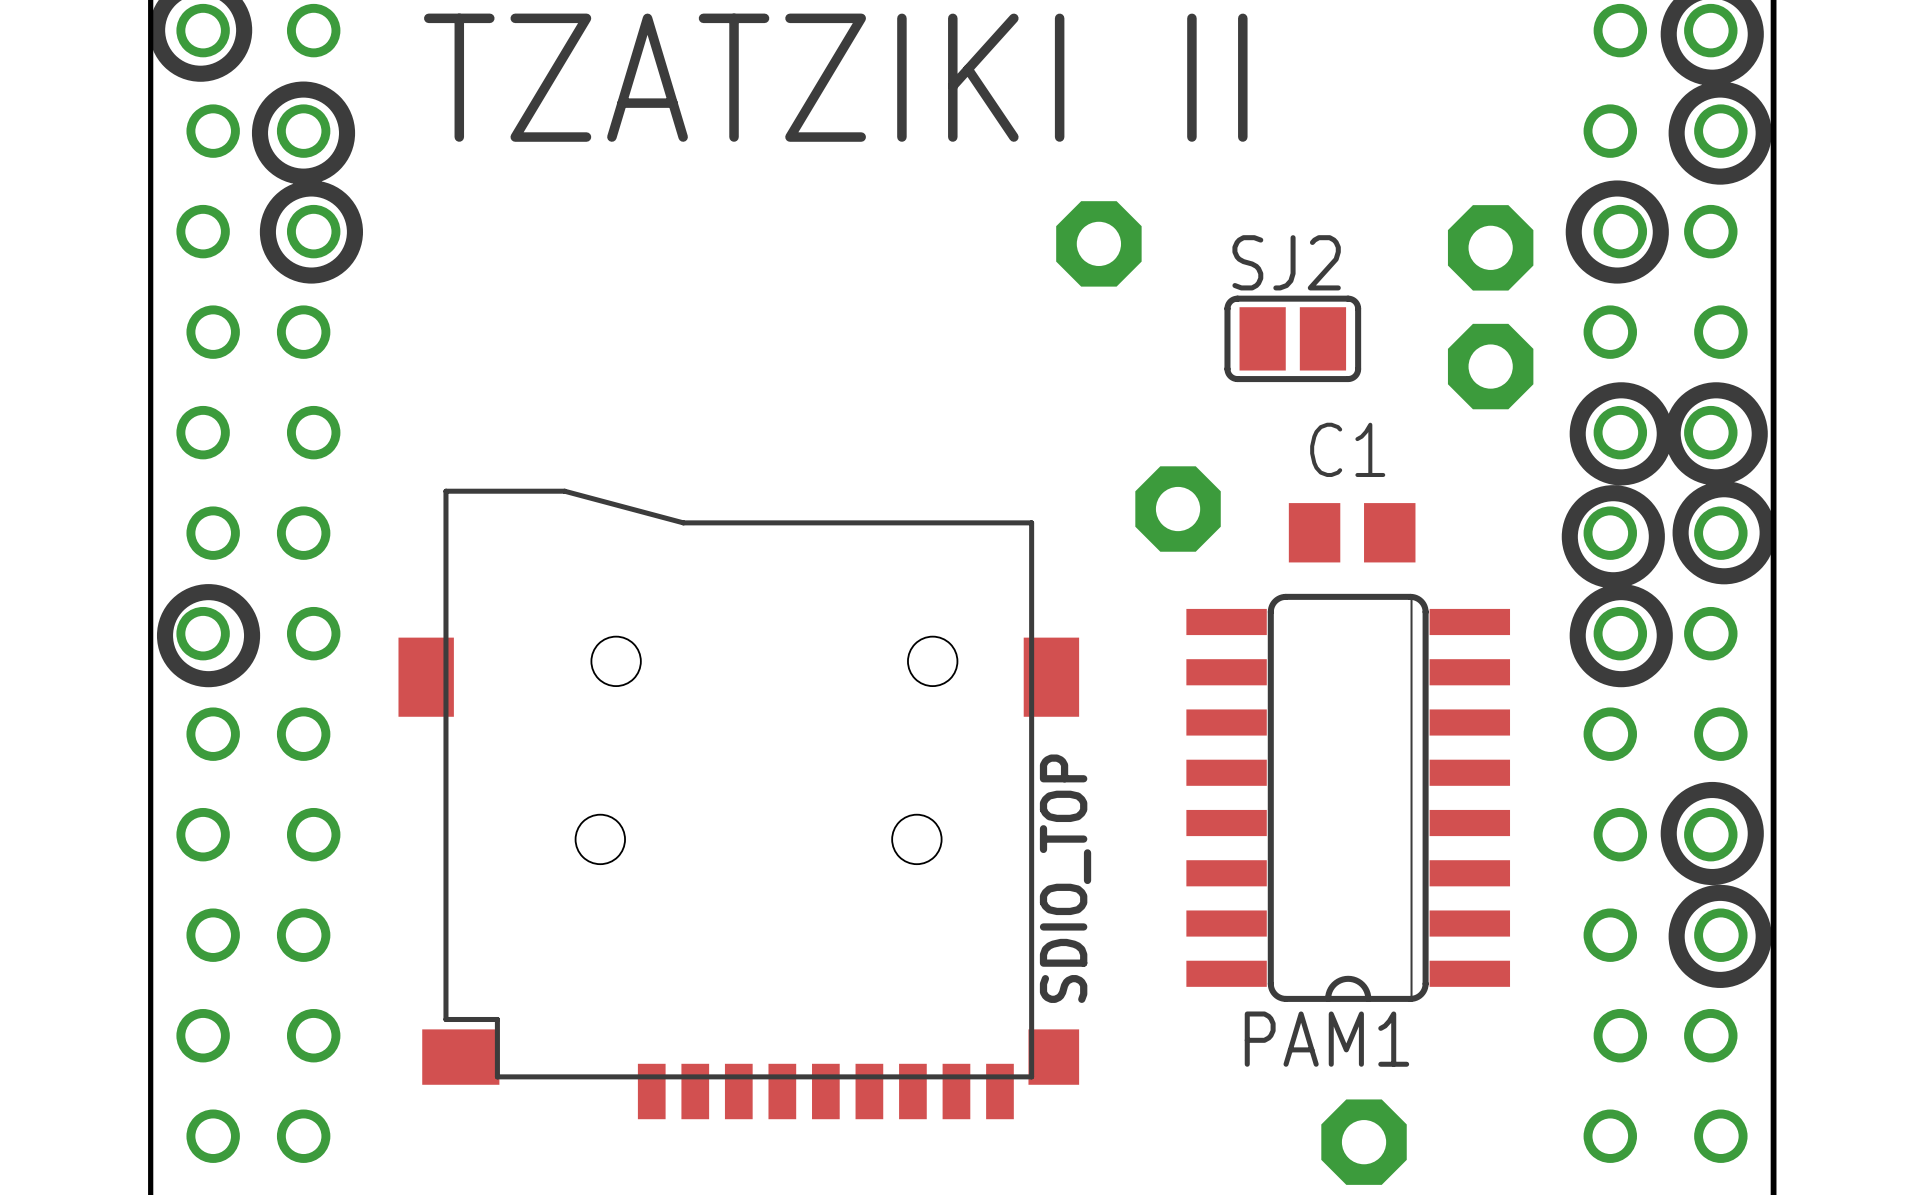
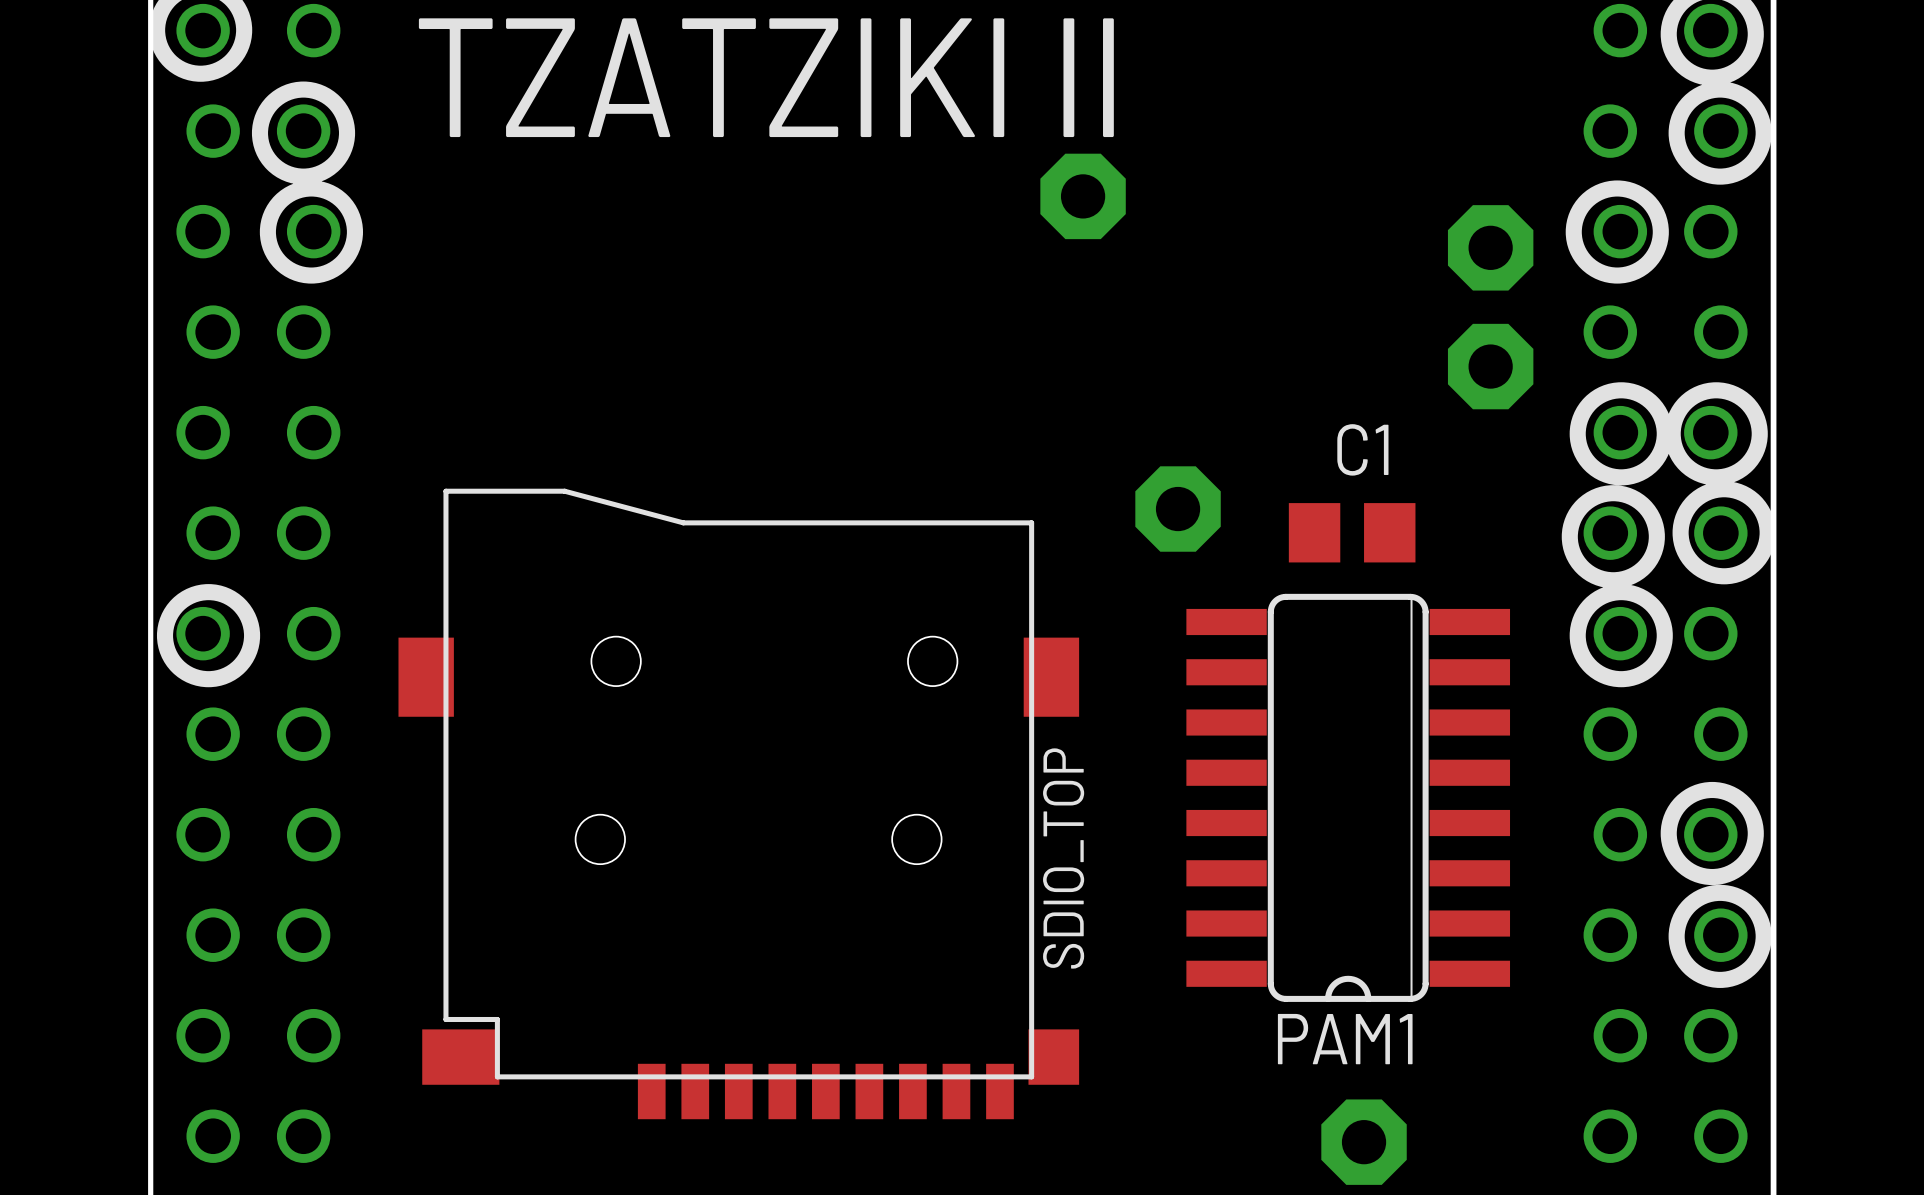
part position: (1098, 243) -> (1083, 196)
SJ2: (1292, 338) -> none

